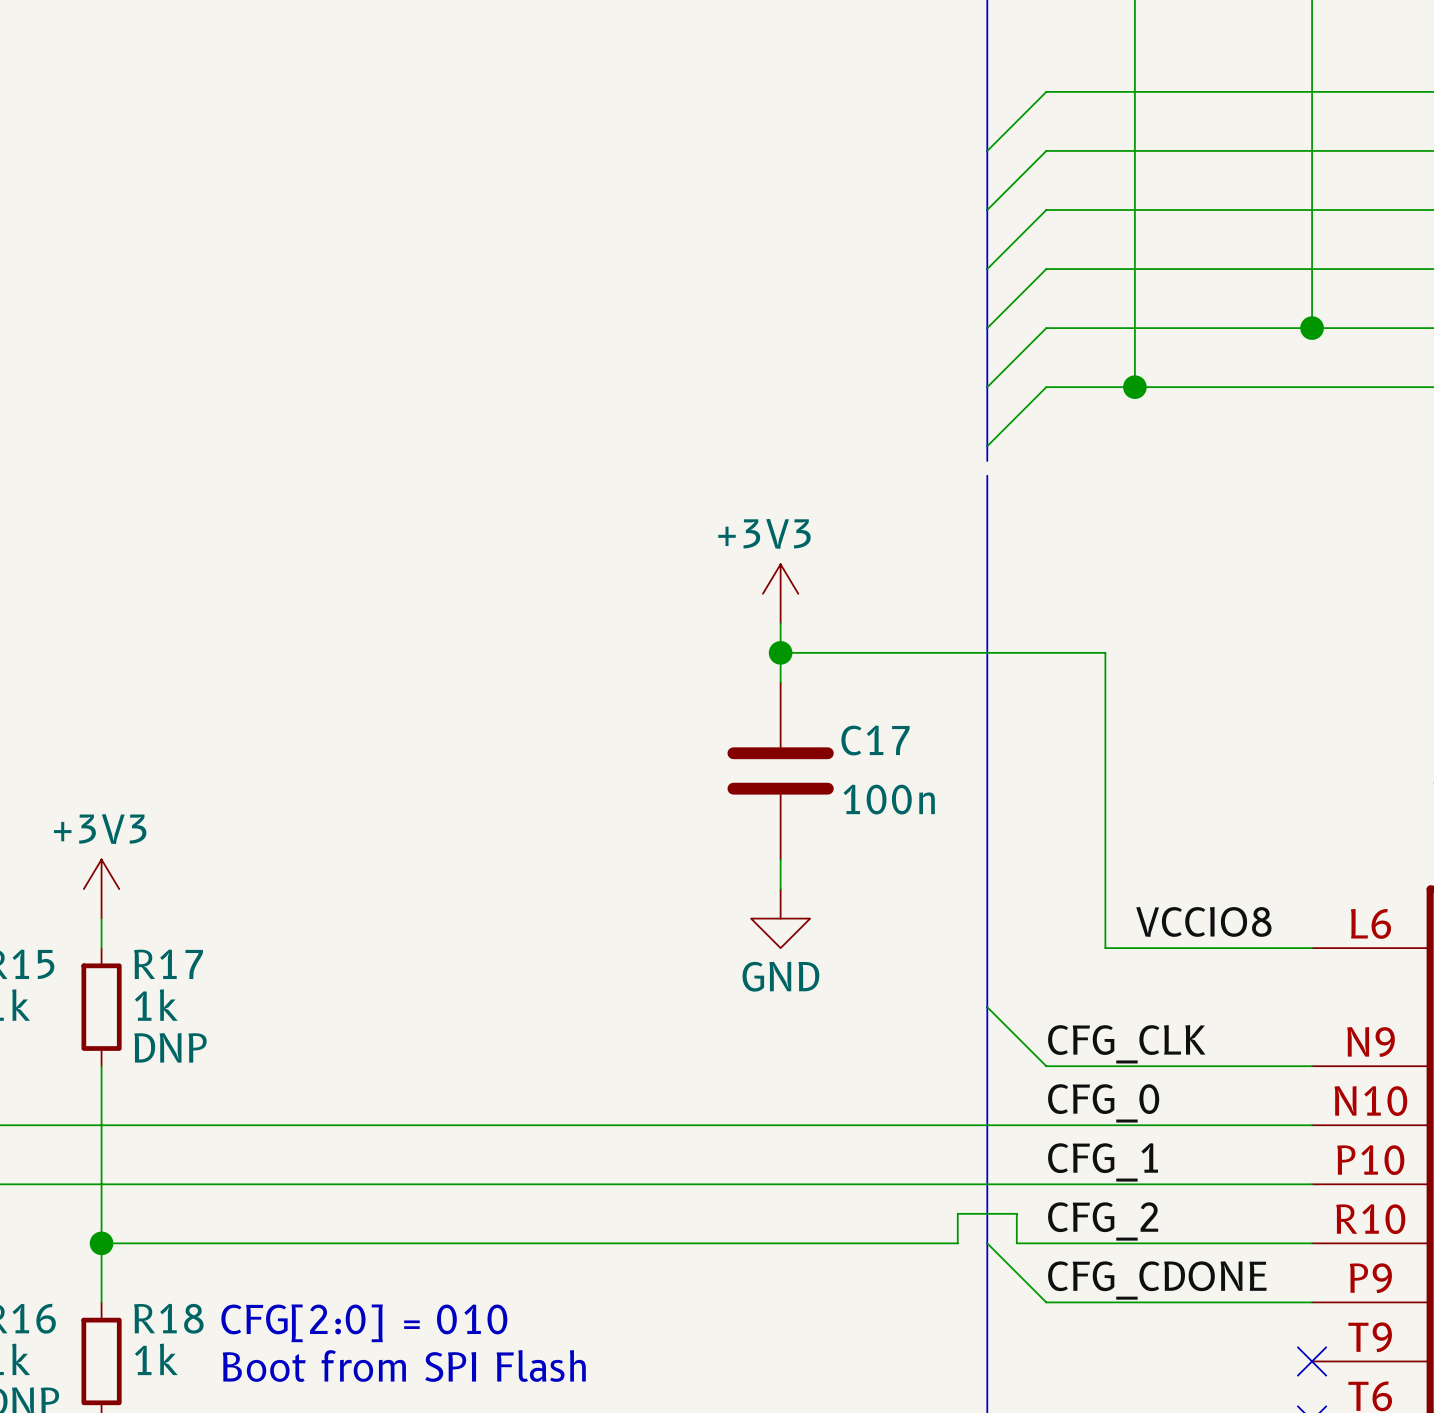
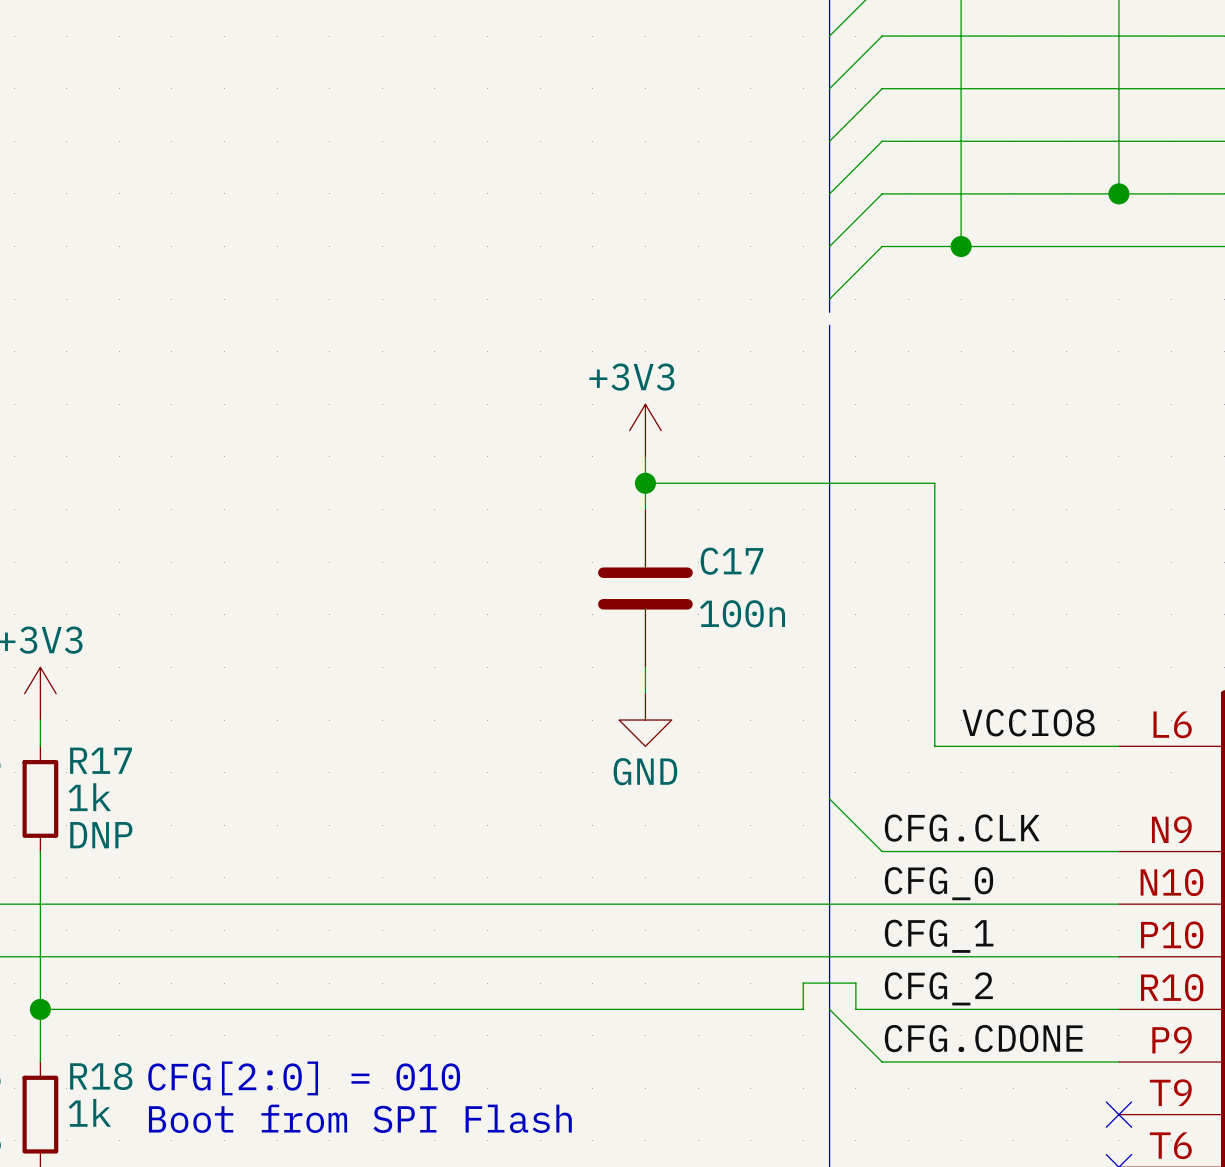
label: CFG_CLK (1126, 1044) -> CFG.CLK (962, 828)
label: CFG_CDONE (1157, 1280) -> CFG.CDONE (983, 1038)

